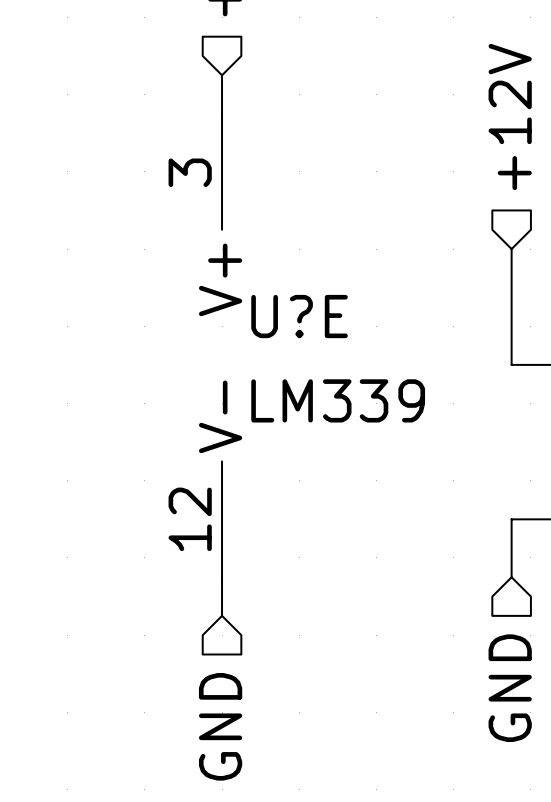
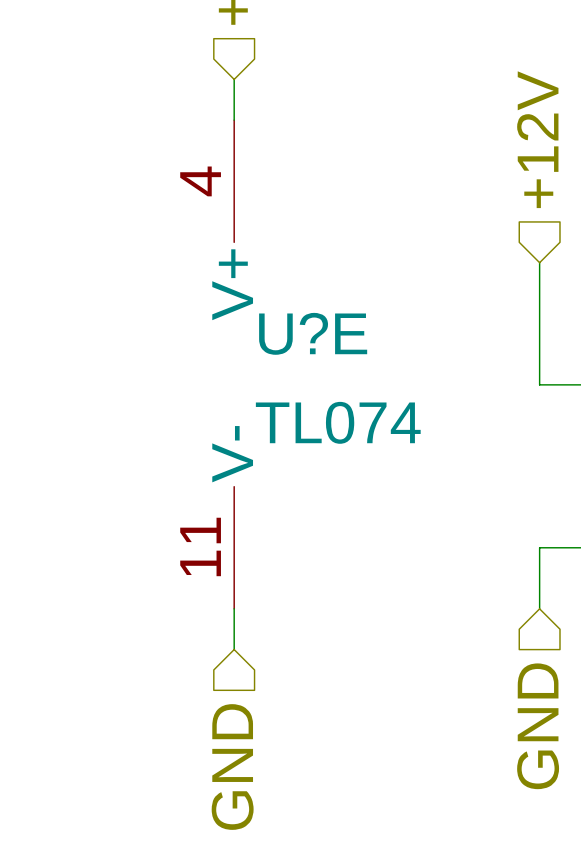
U?E pin number: 3 (190, 172) -> 4 (200, 181)
U?E value: LM339 (338, 400) -> TL074 (338, 422)
U?E pin number: 12 (190, 519) -> 11 (200, 546)

